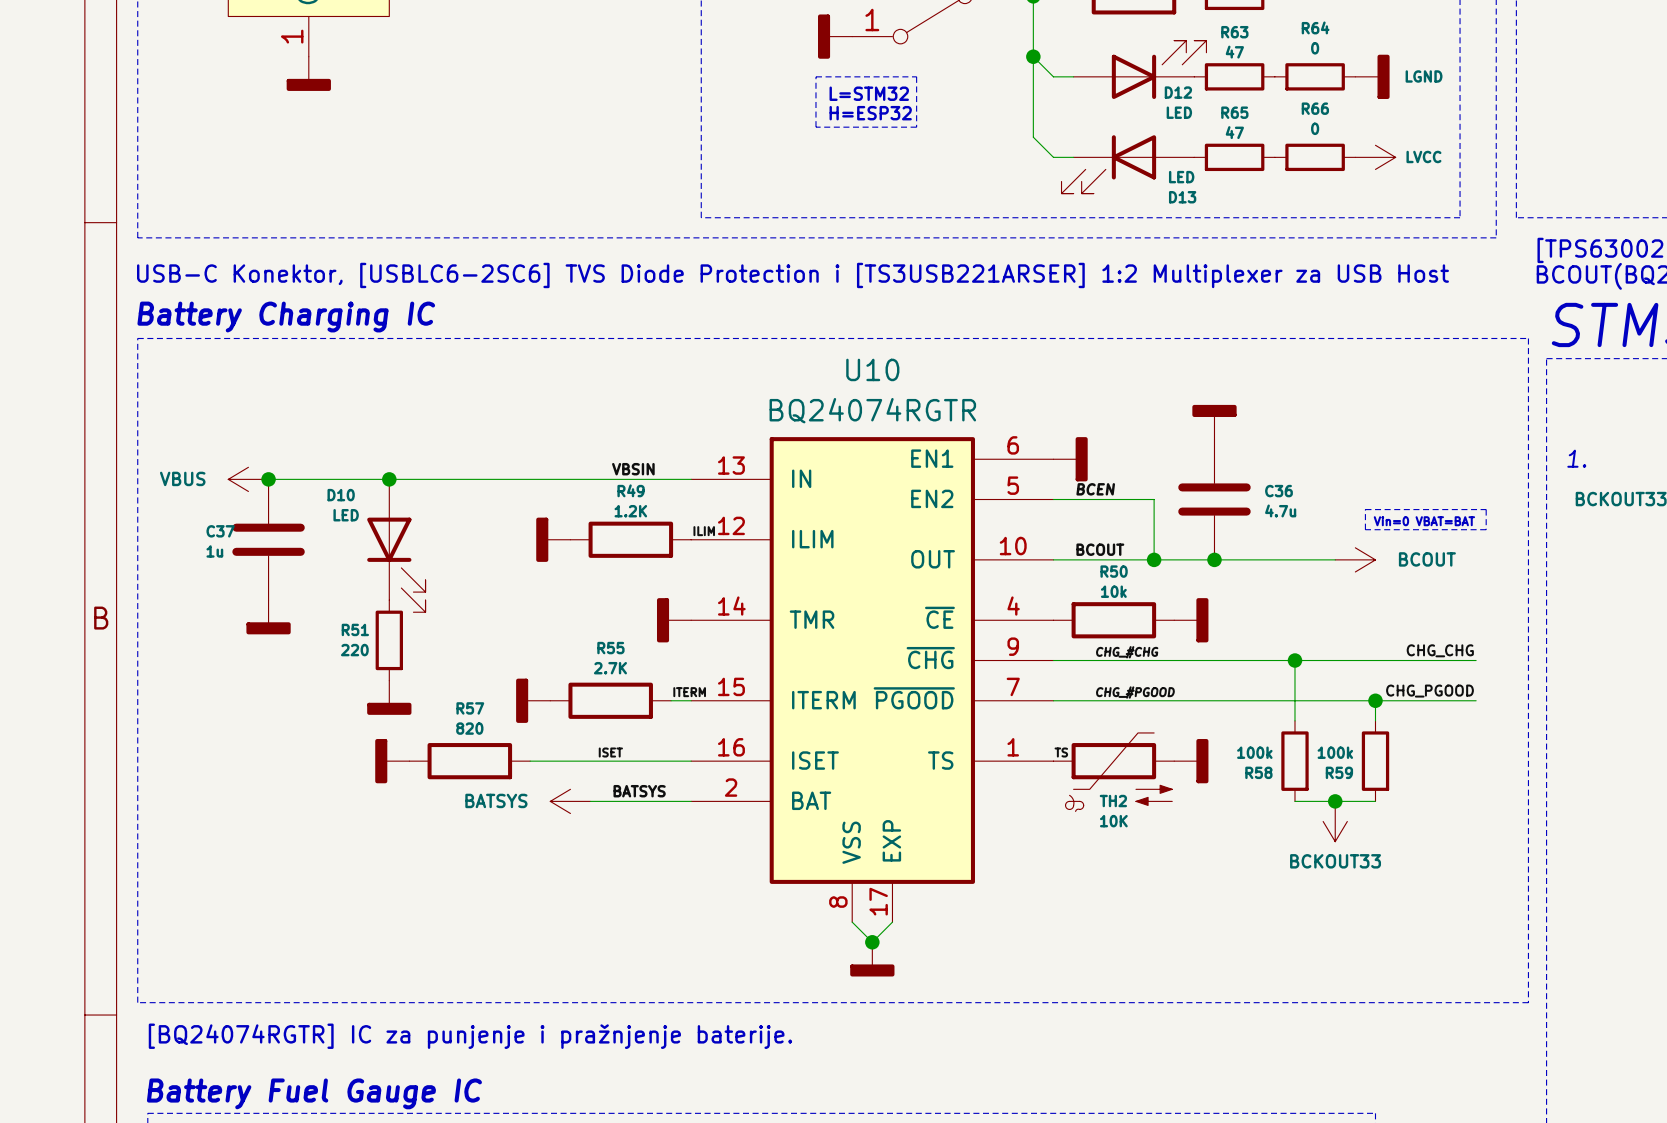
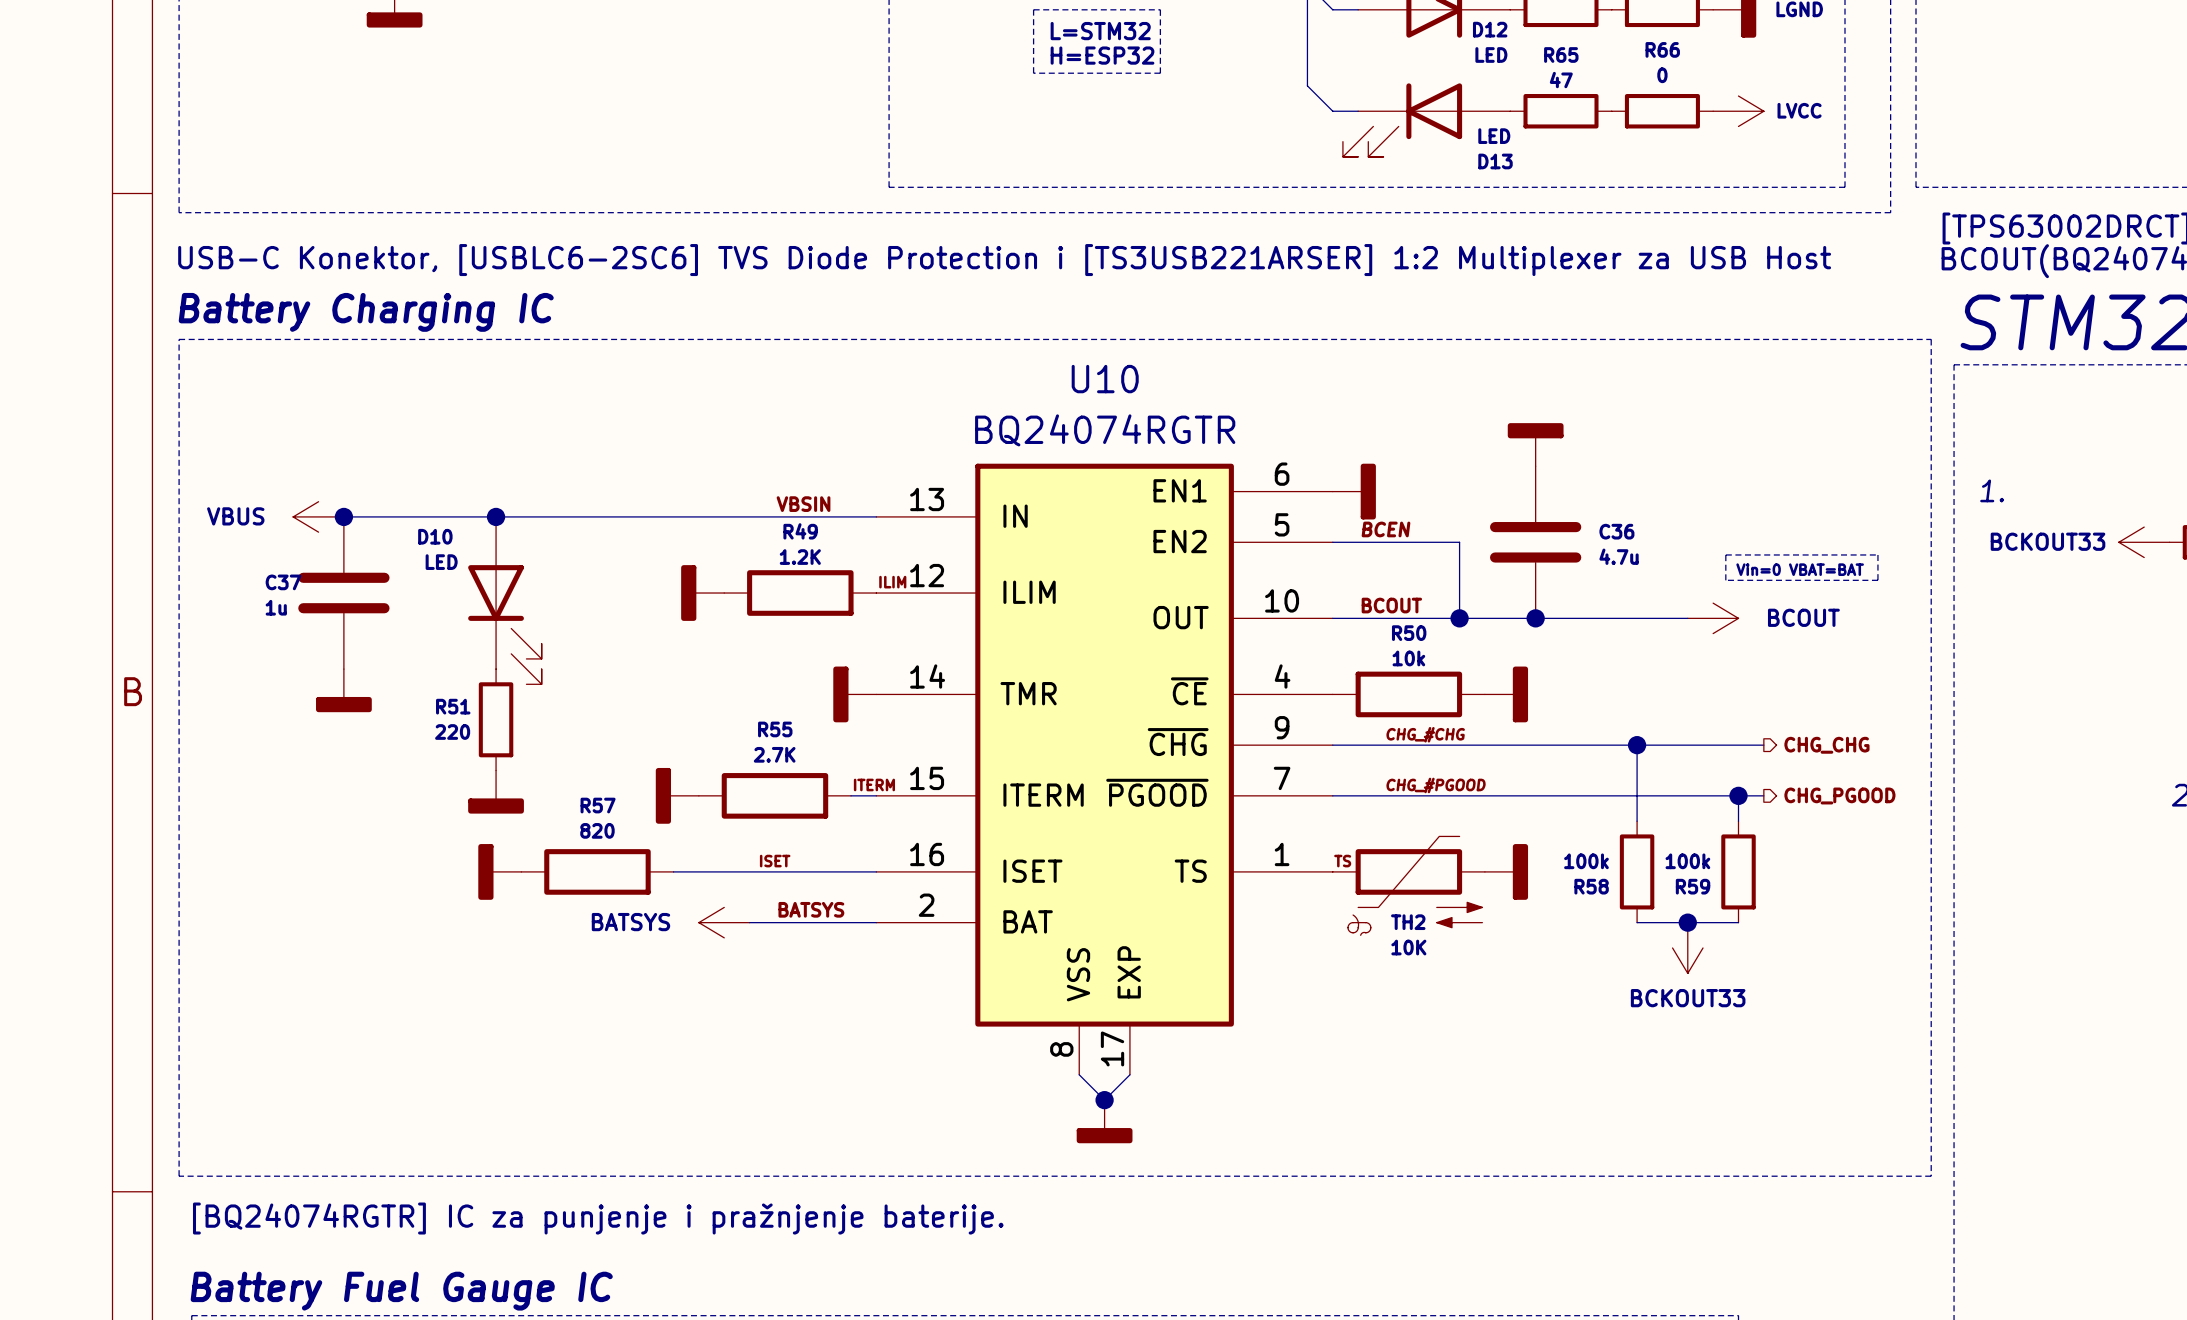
label: CHG_CHG (1440, 650) -> none
wire: (1395, 660) (1476, 660) -> none
hierarchical label: none -> CHG_CHG (1826, 745)
label: CHG_PGOOD (1429, 691) -> none
wire: (1395, 700) (1476, 700) -> none
hierarchical label: none -> CHG_PGOOD (1839, 795)

